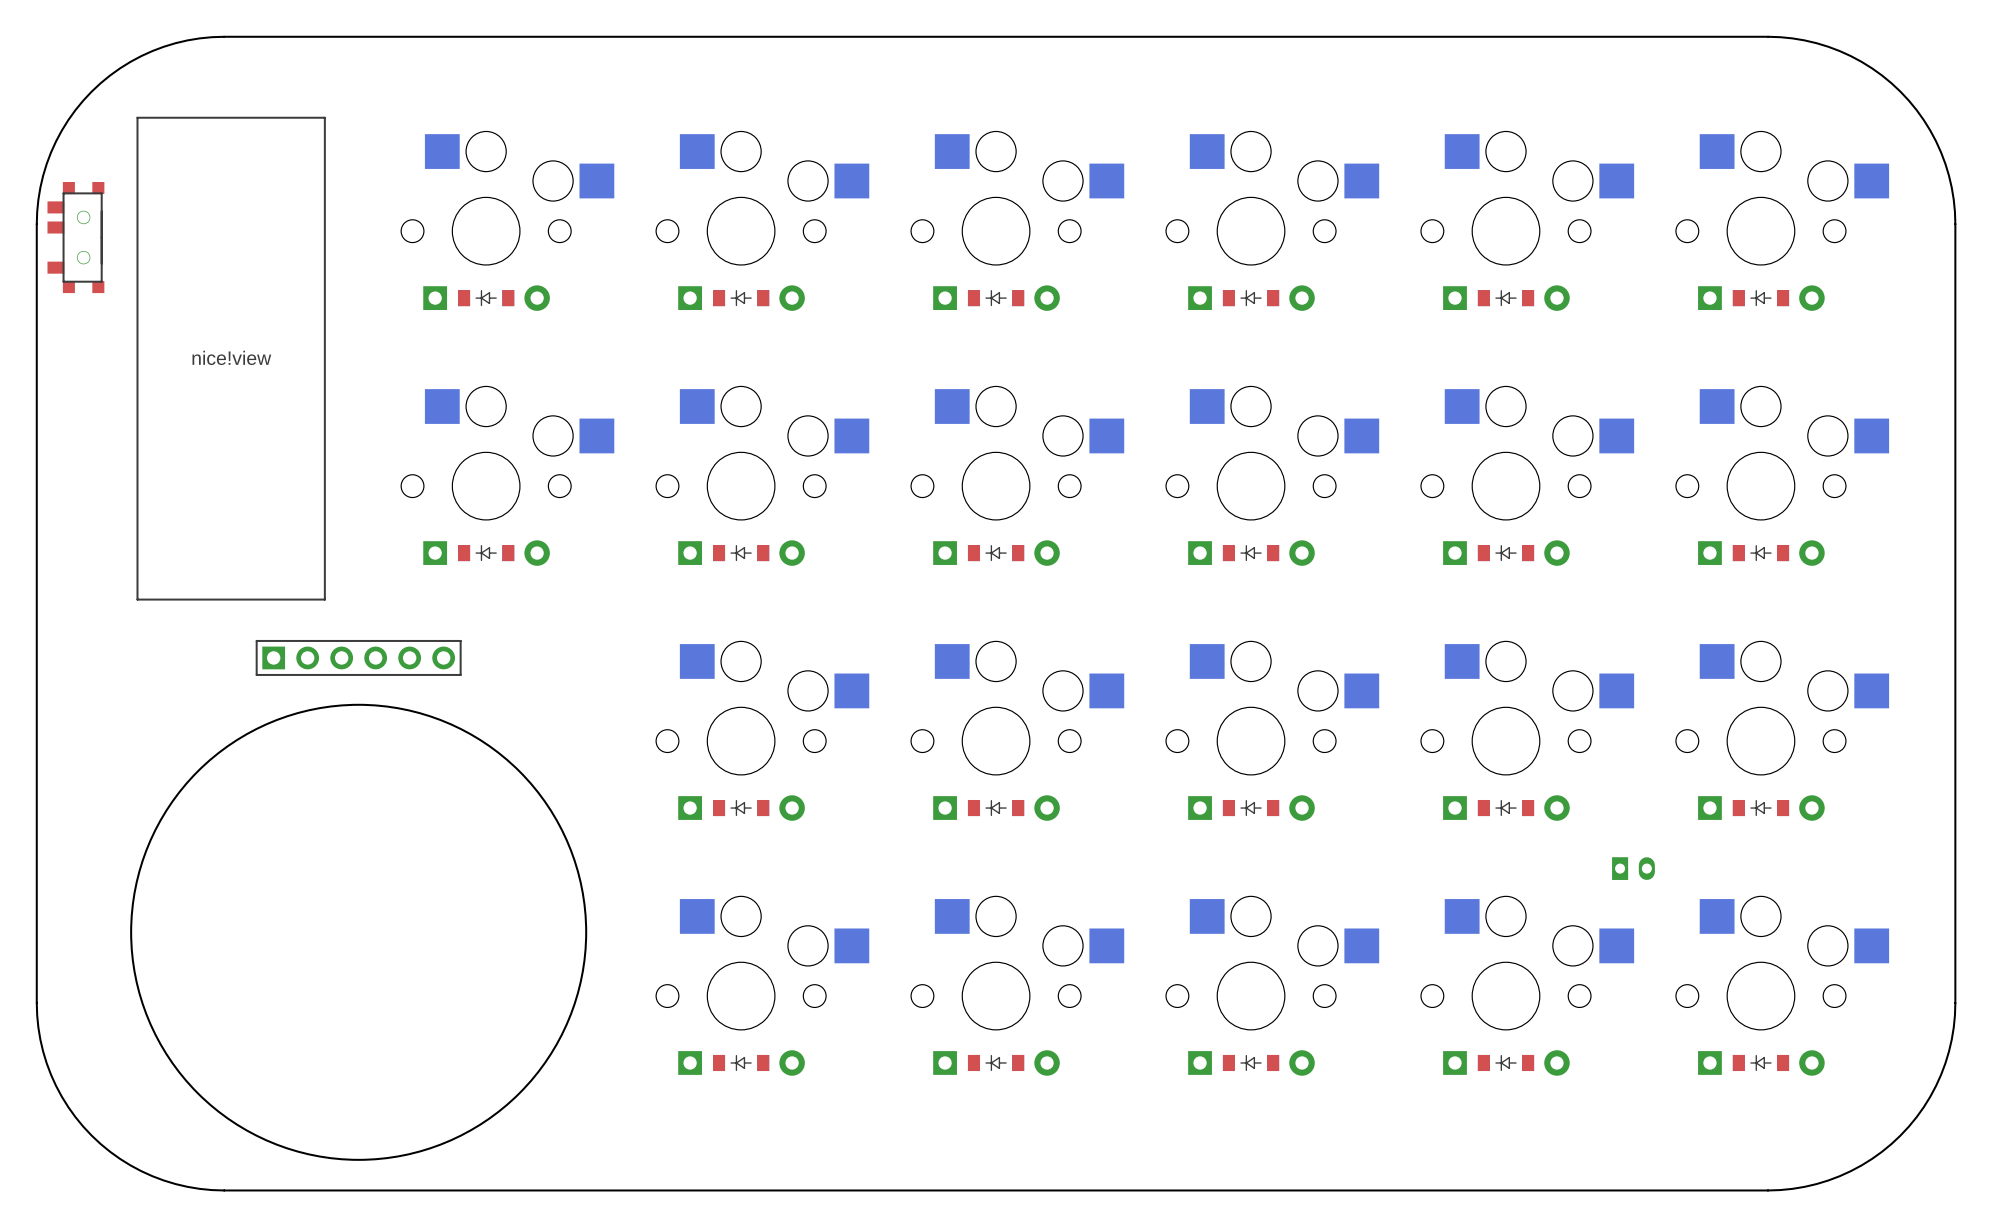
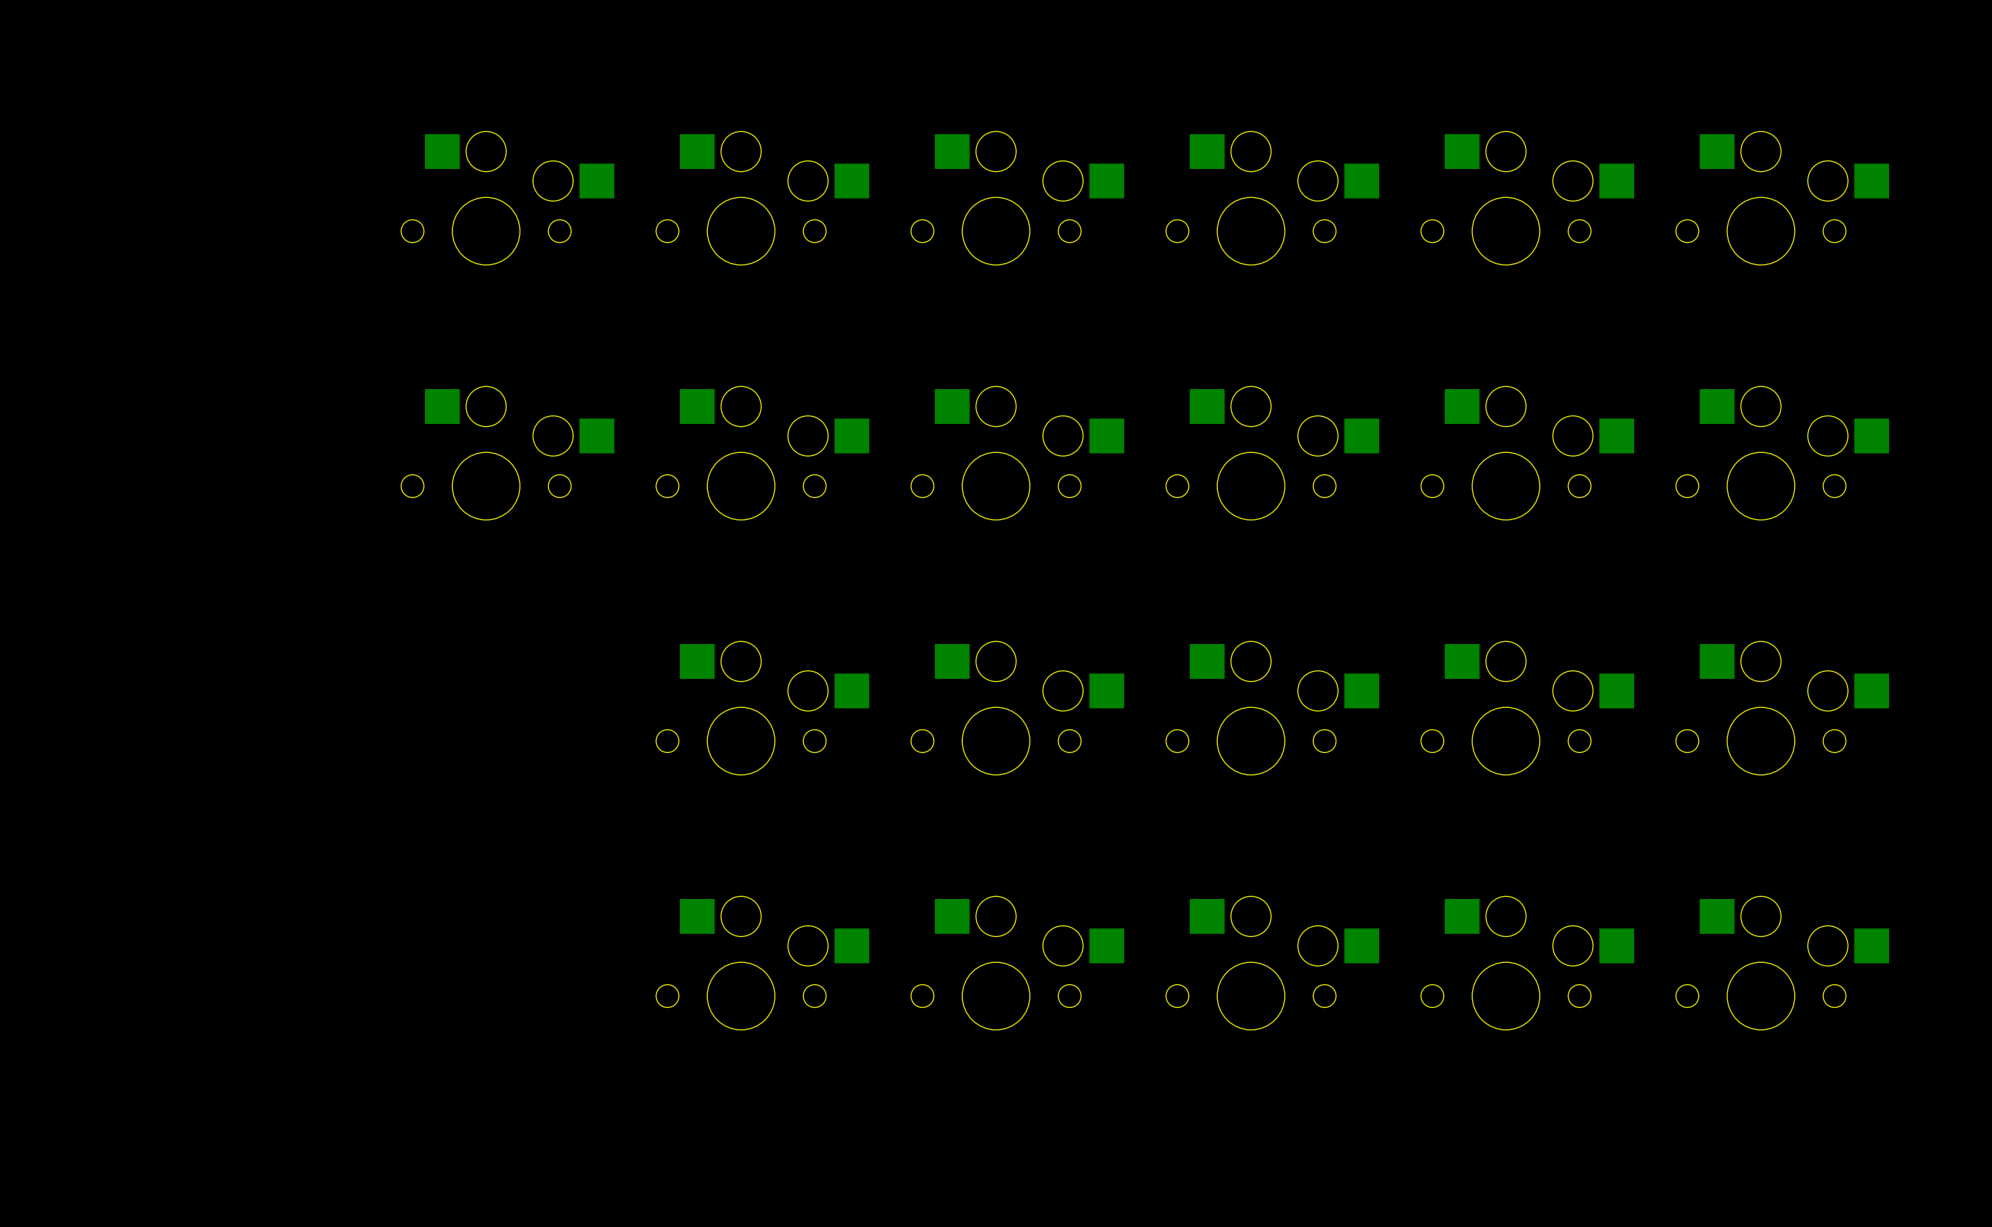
board edge: (224, 36) (1767, 36) (1792, 38) (1816, 43) (1850, 56) (1872, 68) (1900, 91) (1916, 110) (1930, 130) (1941, 152) (1948, 175) (1954, 211) (1954, 1015) (1951, 1039) (1945, 1063) (1936, 1085) (1923, 1107) (1908, 1126) (1891, 1143) (1872, 1158) (1850, 1171) (1828, 1180) (1804, 1186) (1767, 1190) (224, 1190) (187, 1186) (163, 1180) (141, 1171) (120, 1158) (91, 1135) (75, 1117) (61, 1096) (51, 1074) (43, 1051) (37, 1015) (37, 211) (43, 175) (56, 141) (75, 110) (100, 83) (130, 61) (152, 51) (187, 40) (224, 36) -> none
drawing: [136, 116, 326, 601] -> none
part: (75, 237) -> none
part: (486, 298) -> none
part: (741, 298) -> none
part: (996, 298) -> none
part: (1251, 298) -> none
part: (1506, 298) -> none
part: (1761, 298) -> none
part: (486, 553) -> none
part: (741, 553) -> none
part: (996, 553) -> none
part: (1251, 553) -> none
part: (1506, 553) -> none
part: (1761, 553) -> none
part: (358, 657) -> none
round board edge: [130, 703, 588, 1161] -> none
part: (741, 808) -> none
part: (996, 808) -> none
part: (1251, 808) -> none
part: (1506, 808) -> none
part: (1761, 808) -> none
part: (1633, 868) -> none
part: (741, 1062) -> none
part: (996, 1062) -> none
part: (1251, 1062) -> none
part: (1506, 1062) -> none
part: (1761, 1062) -> none

